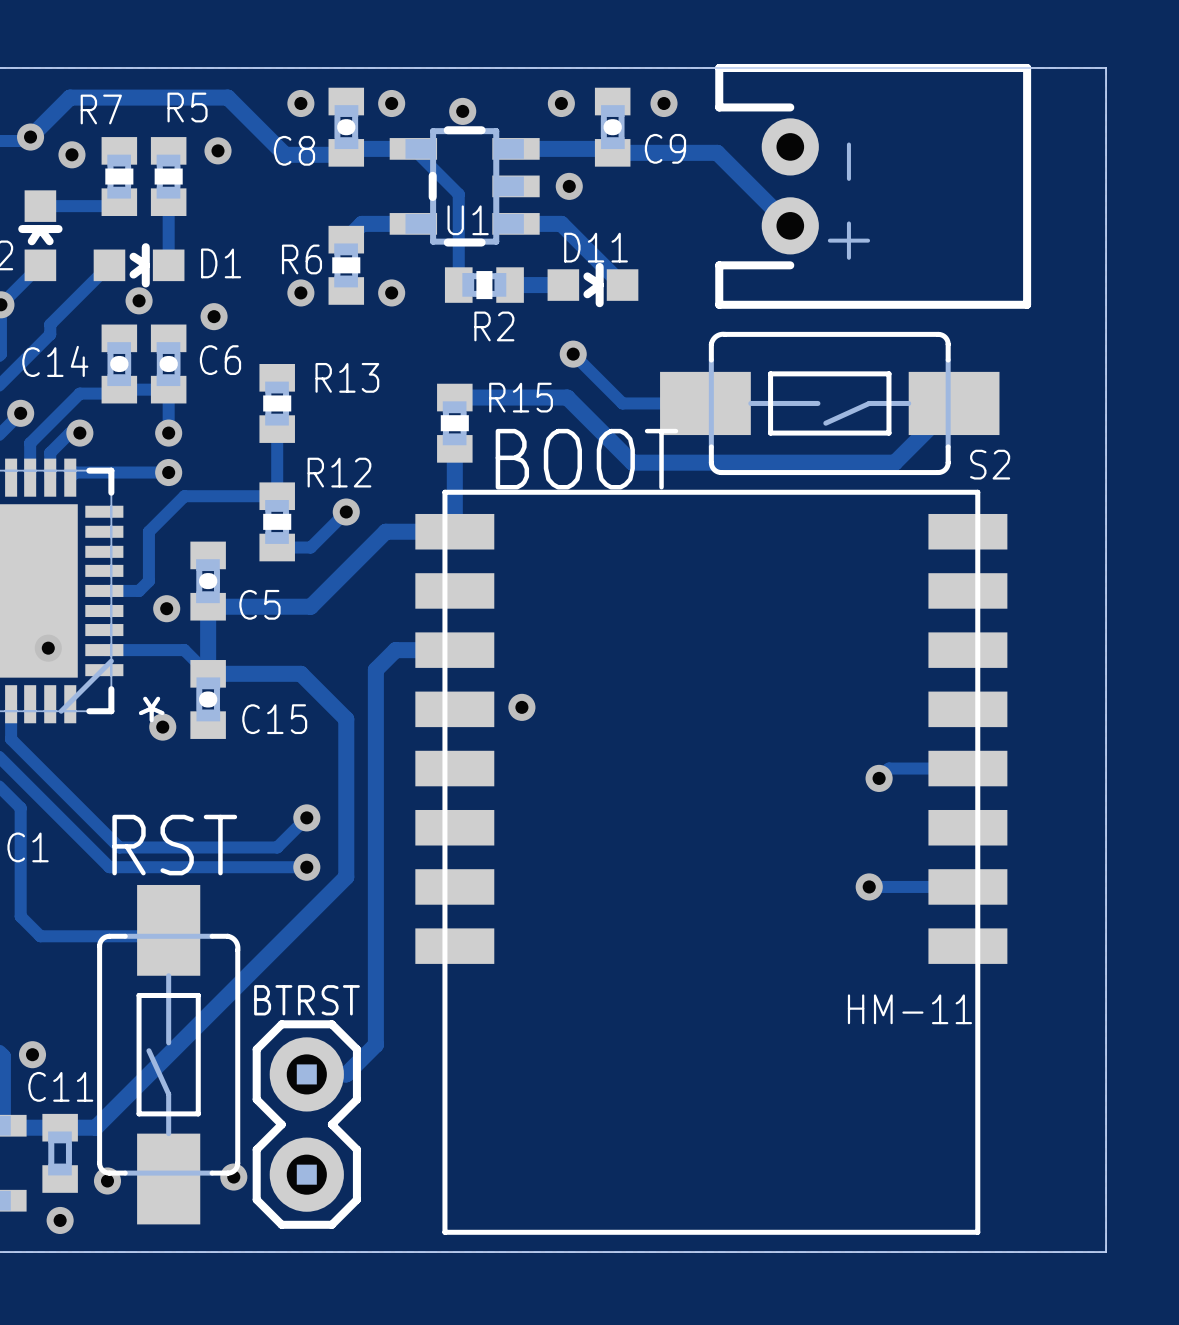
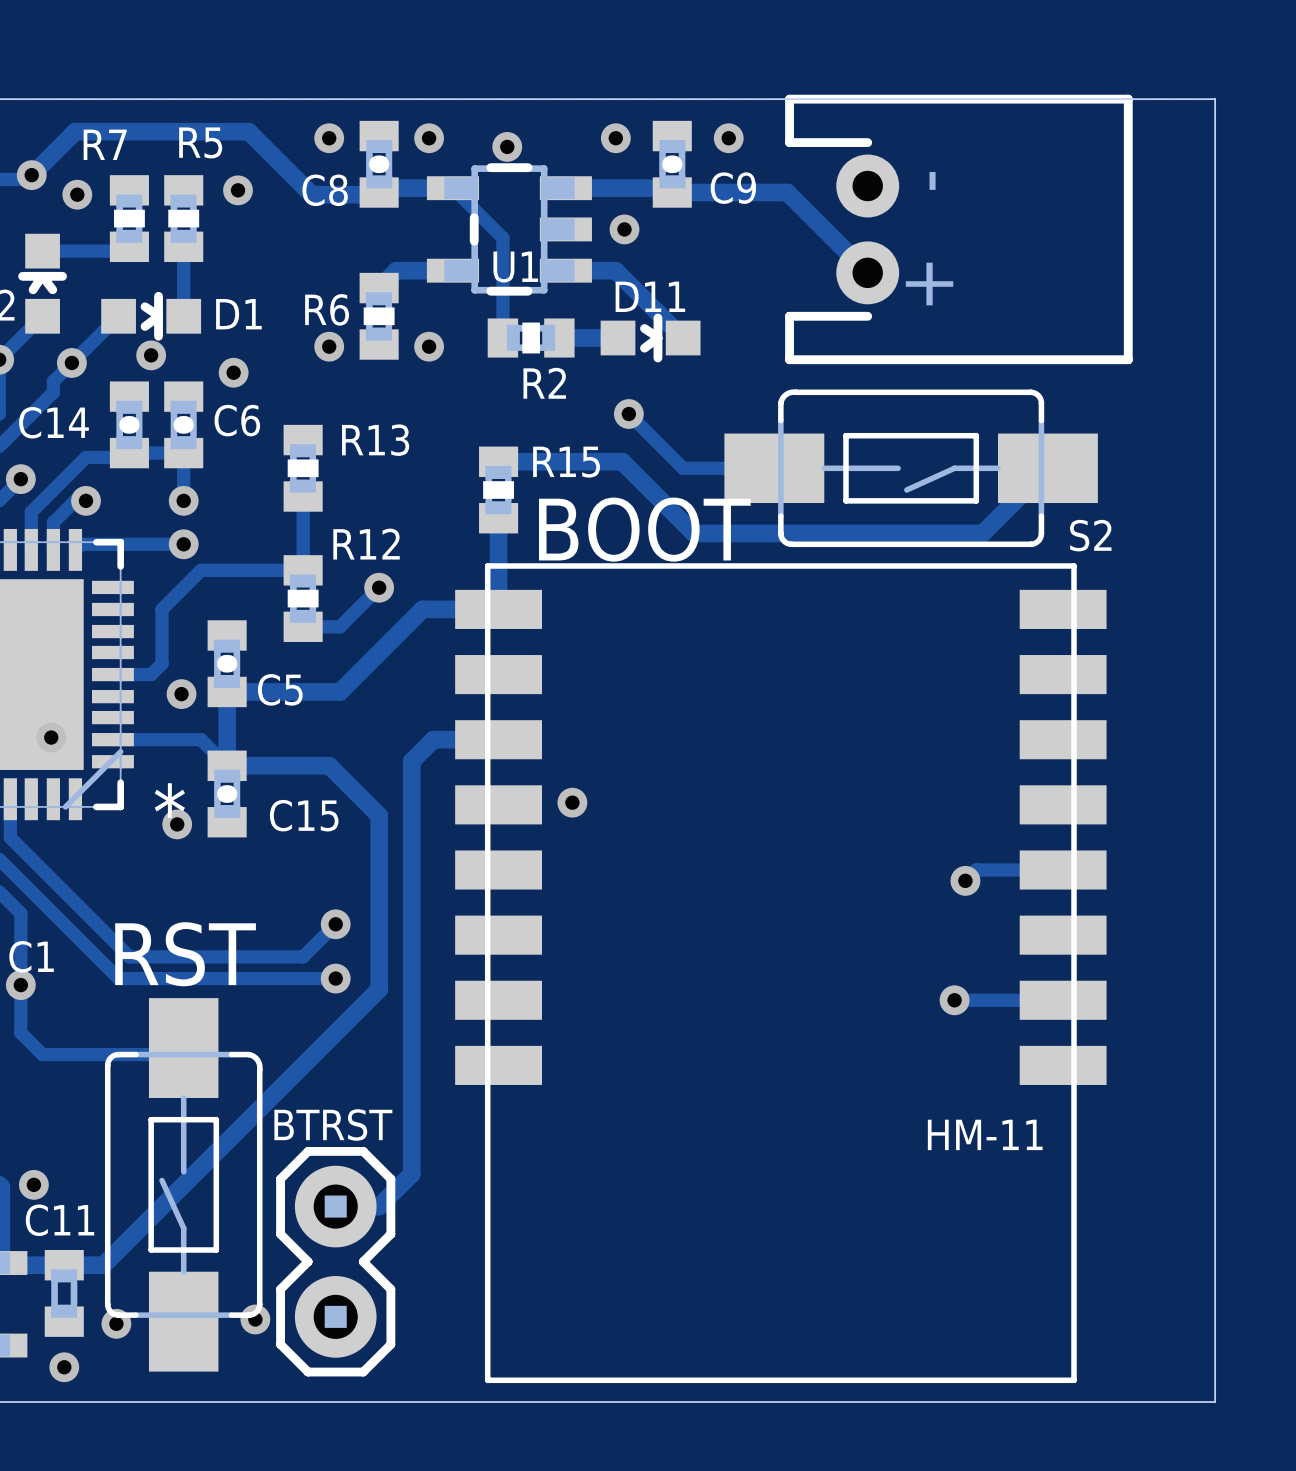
via: none -> (71, 362)
via: none -> (20, 985)

